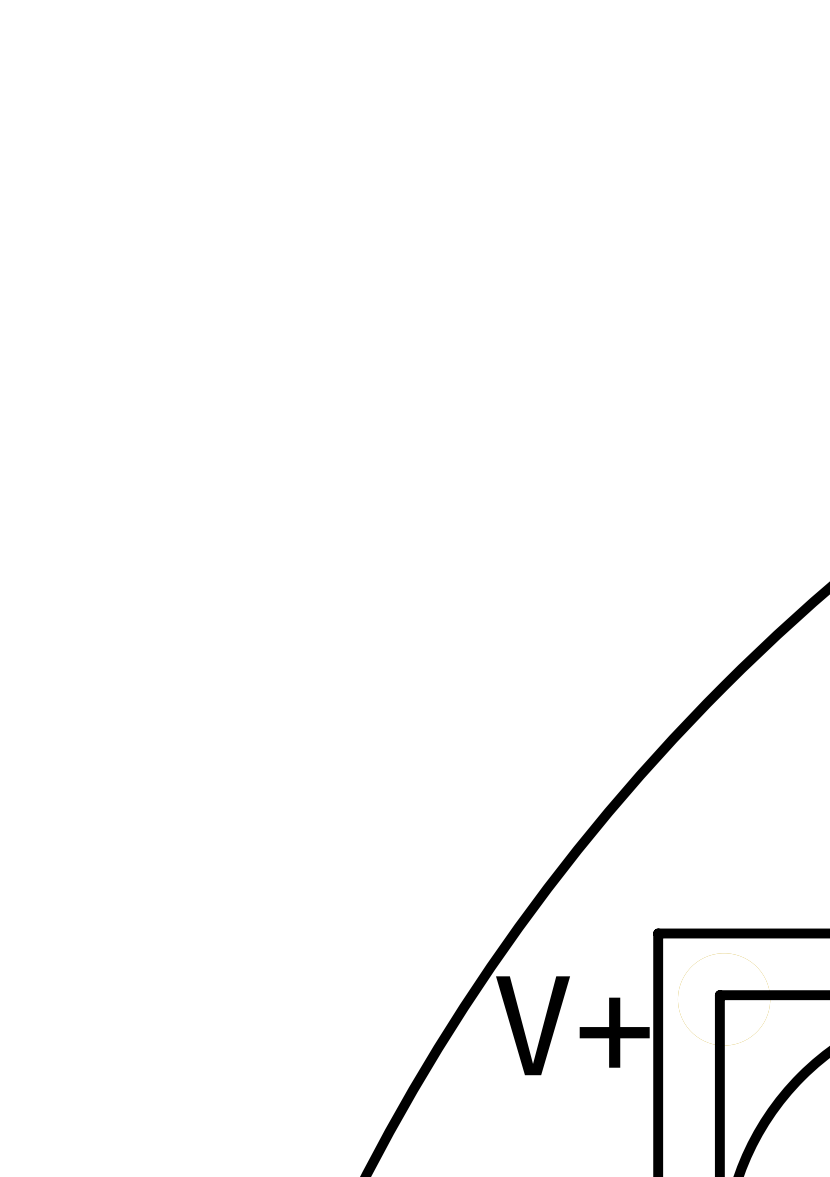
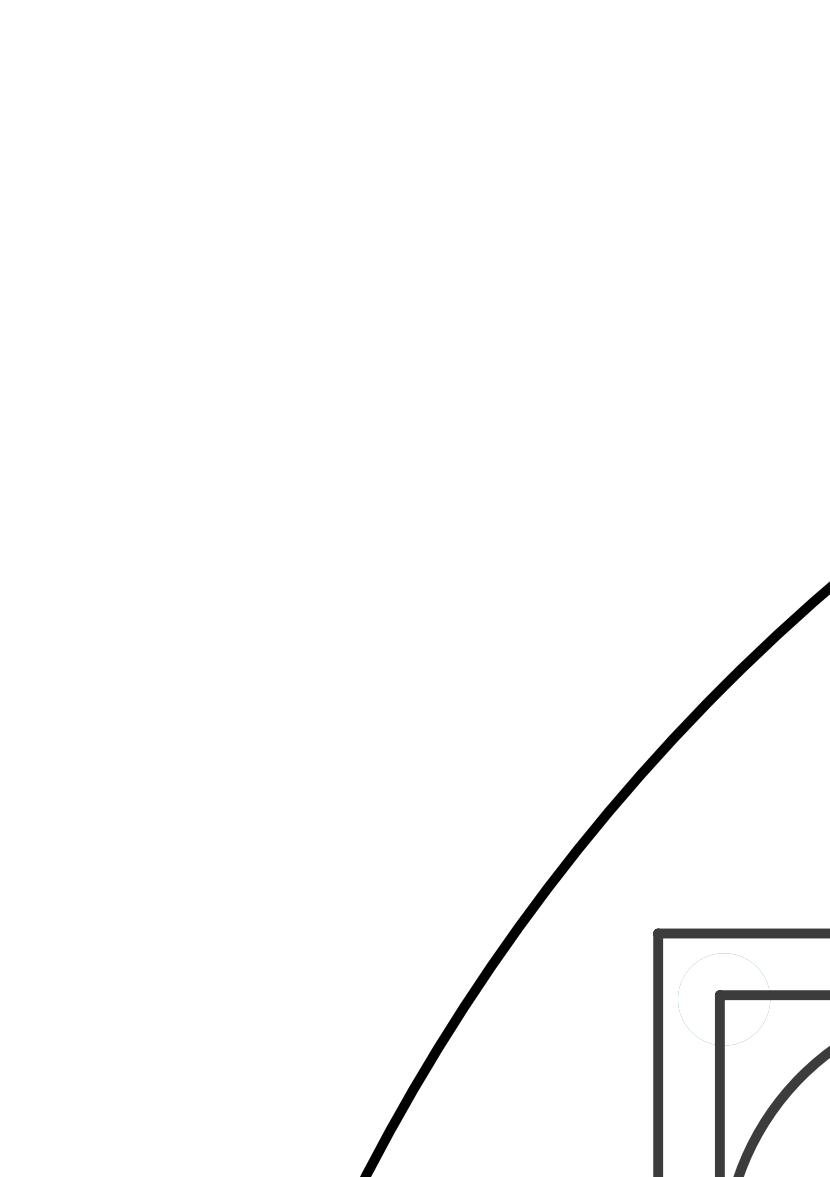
text: V+ (572, 1025) -> none

